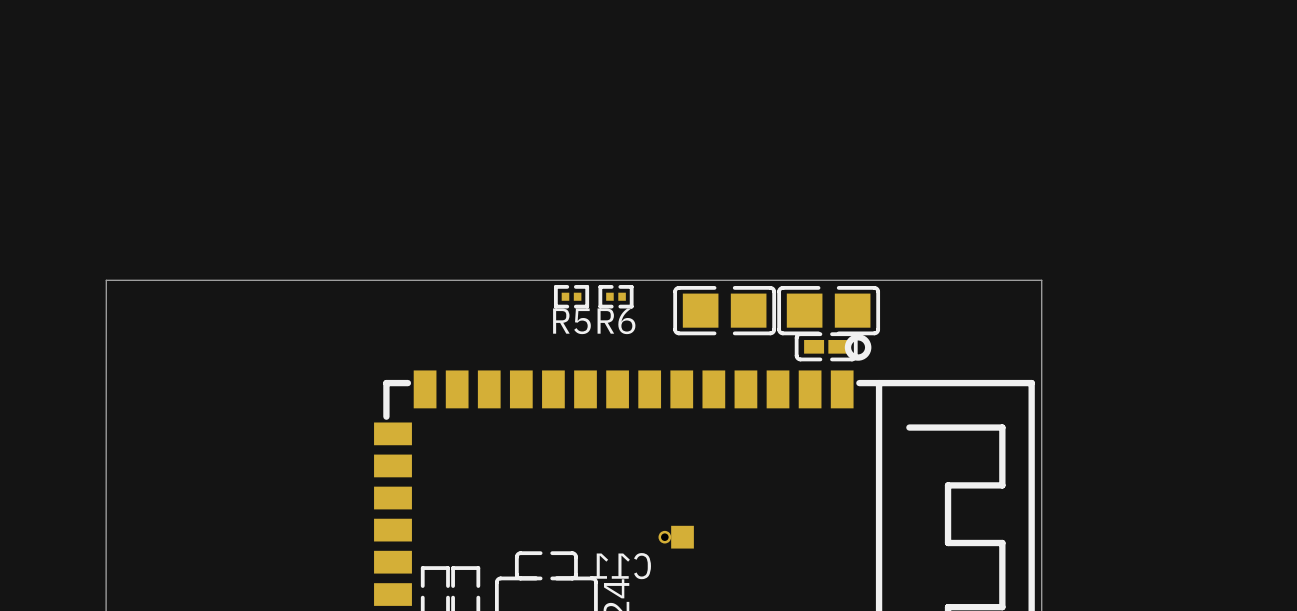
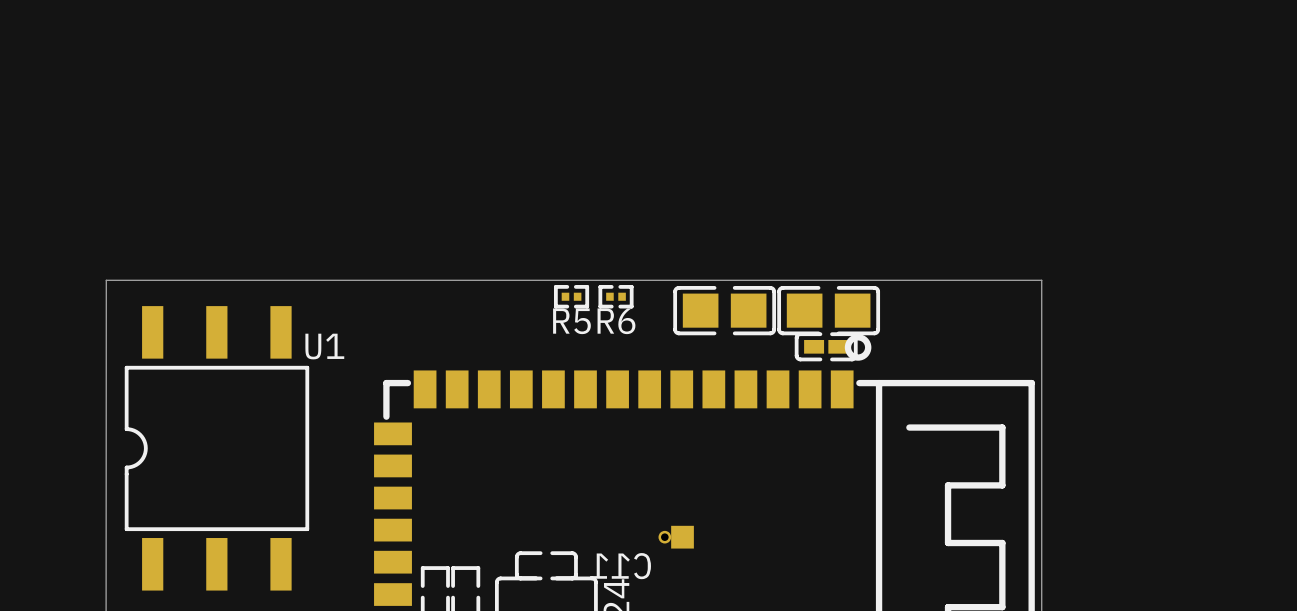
U1: none -> (216, 448)

